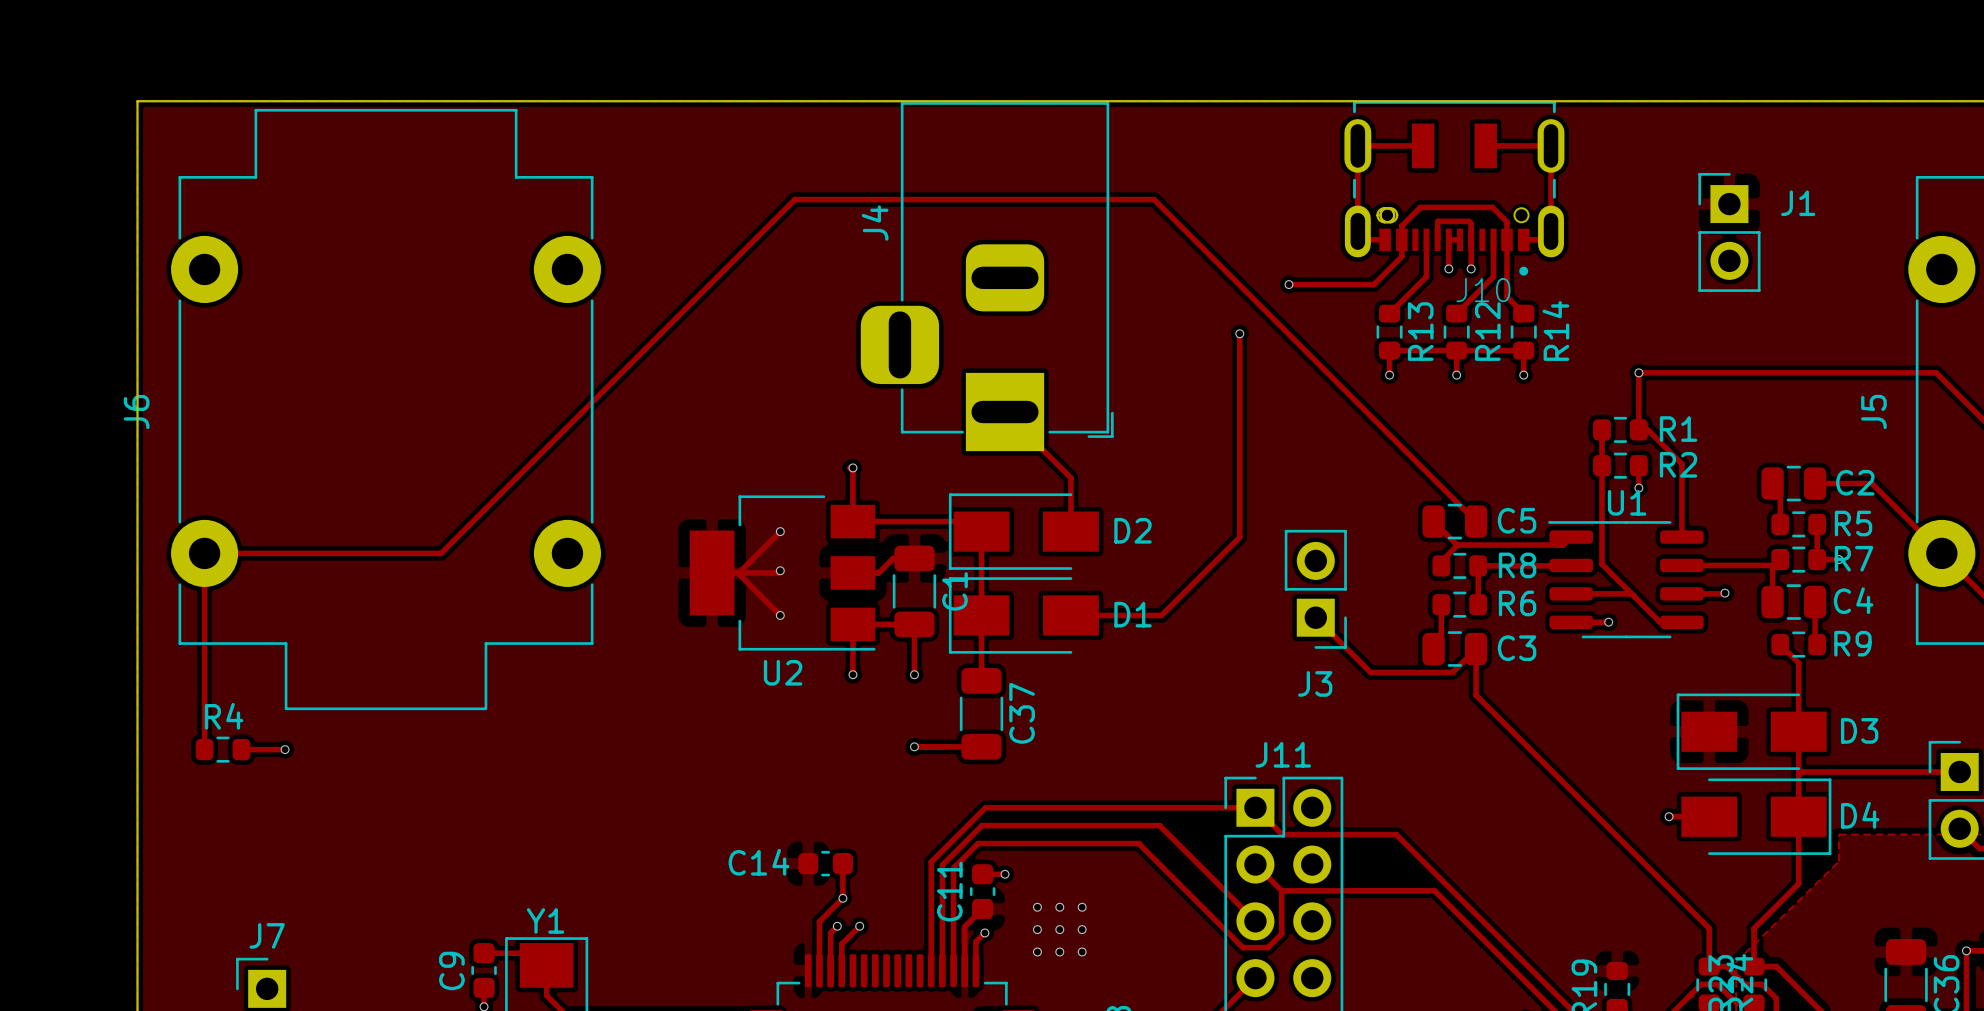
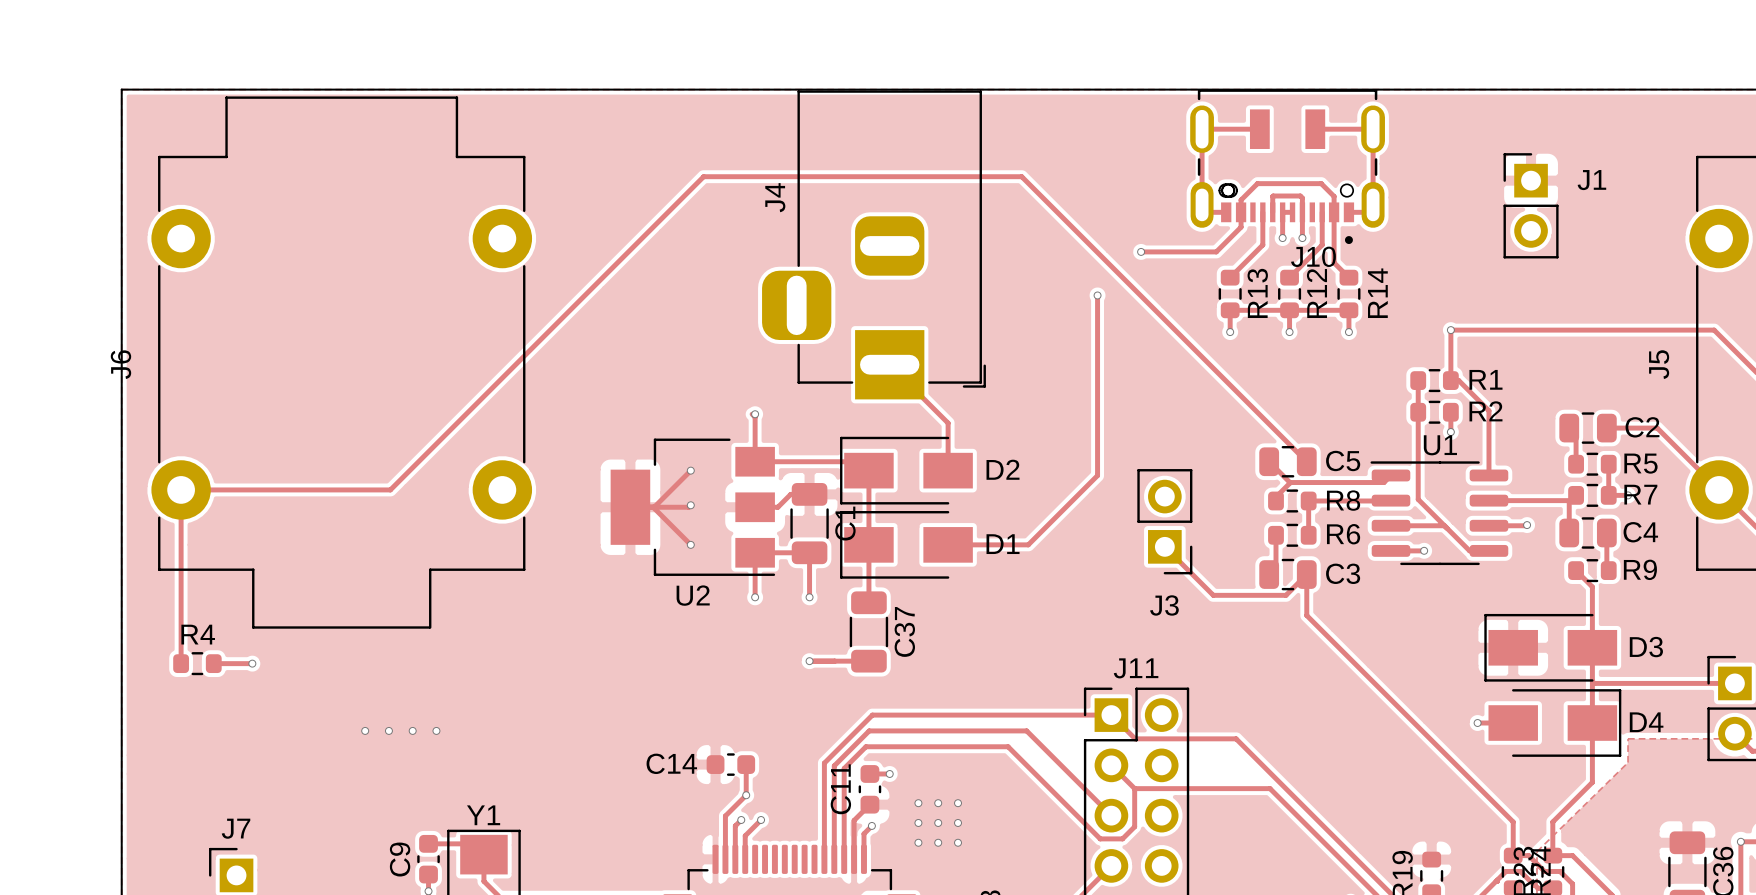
via: none -> (365, 730)
via: none -> (388, 730)
via: none -> (412, 730)
via: none -> (436, 730)

